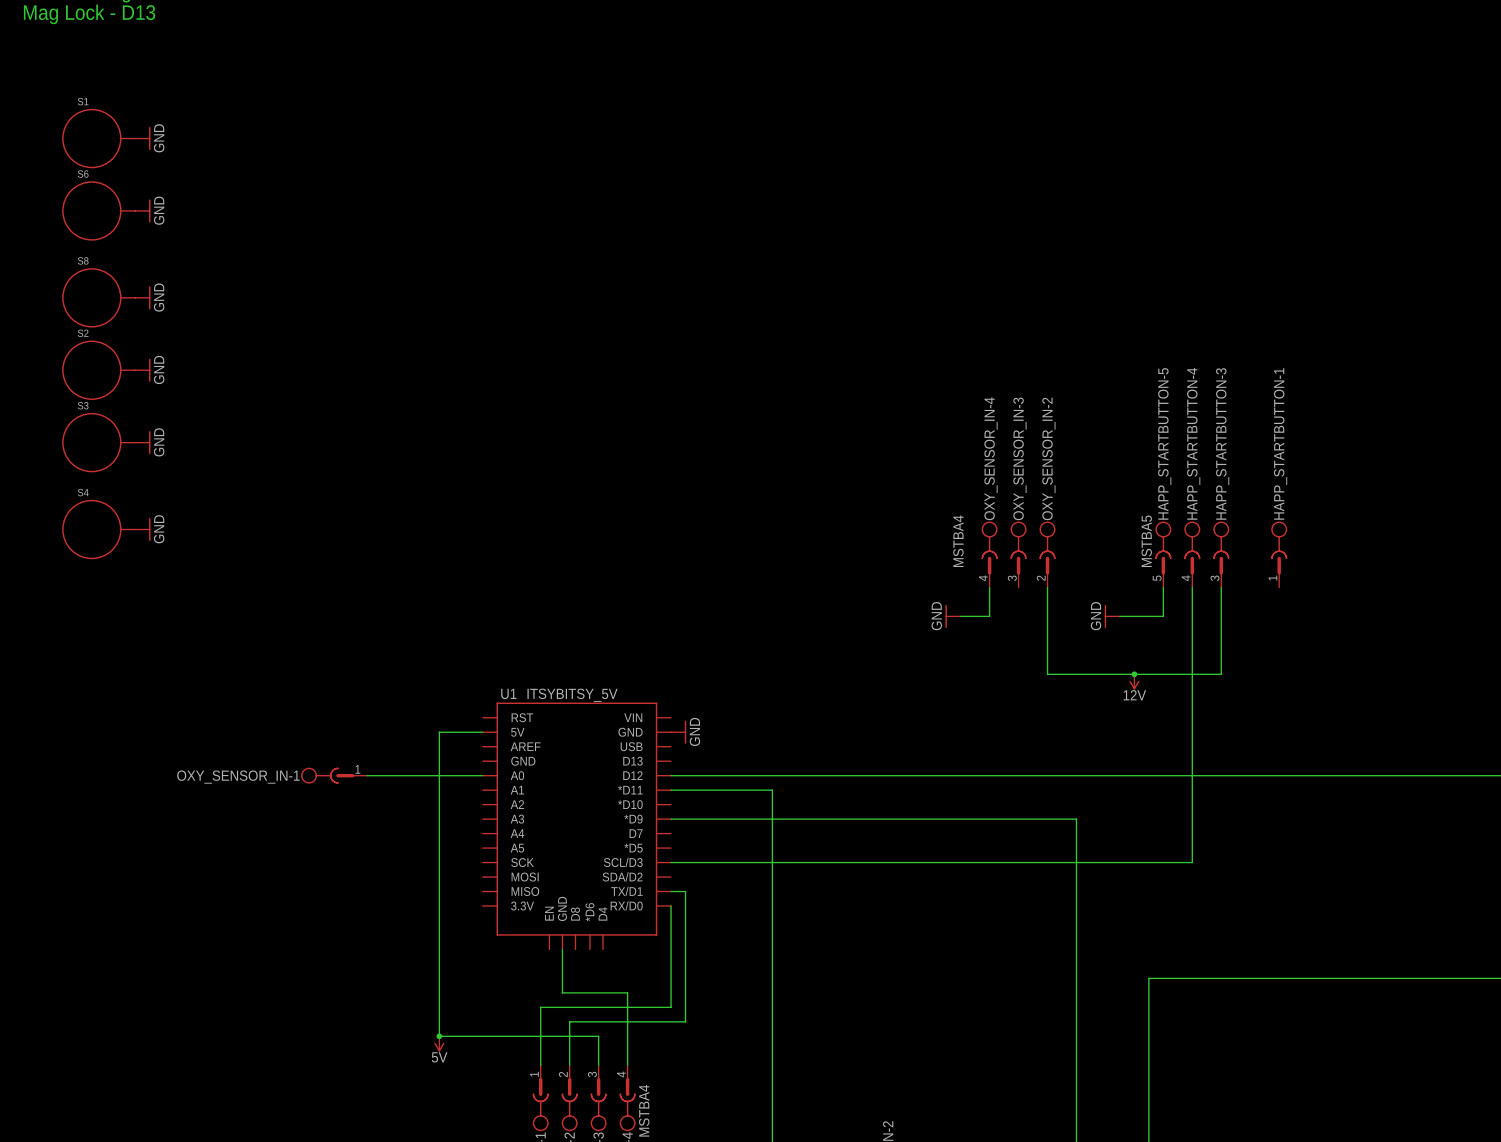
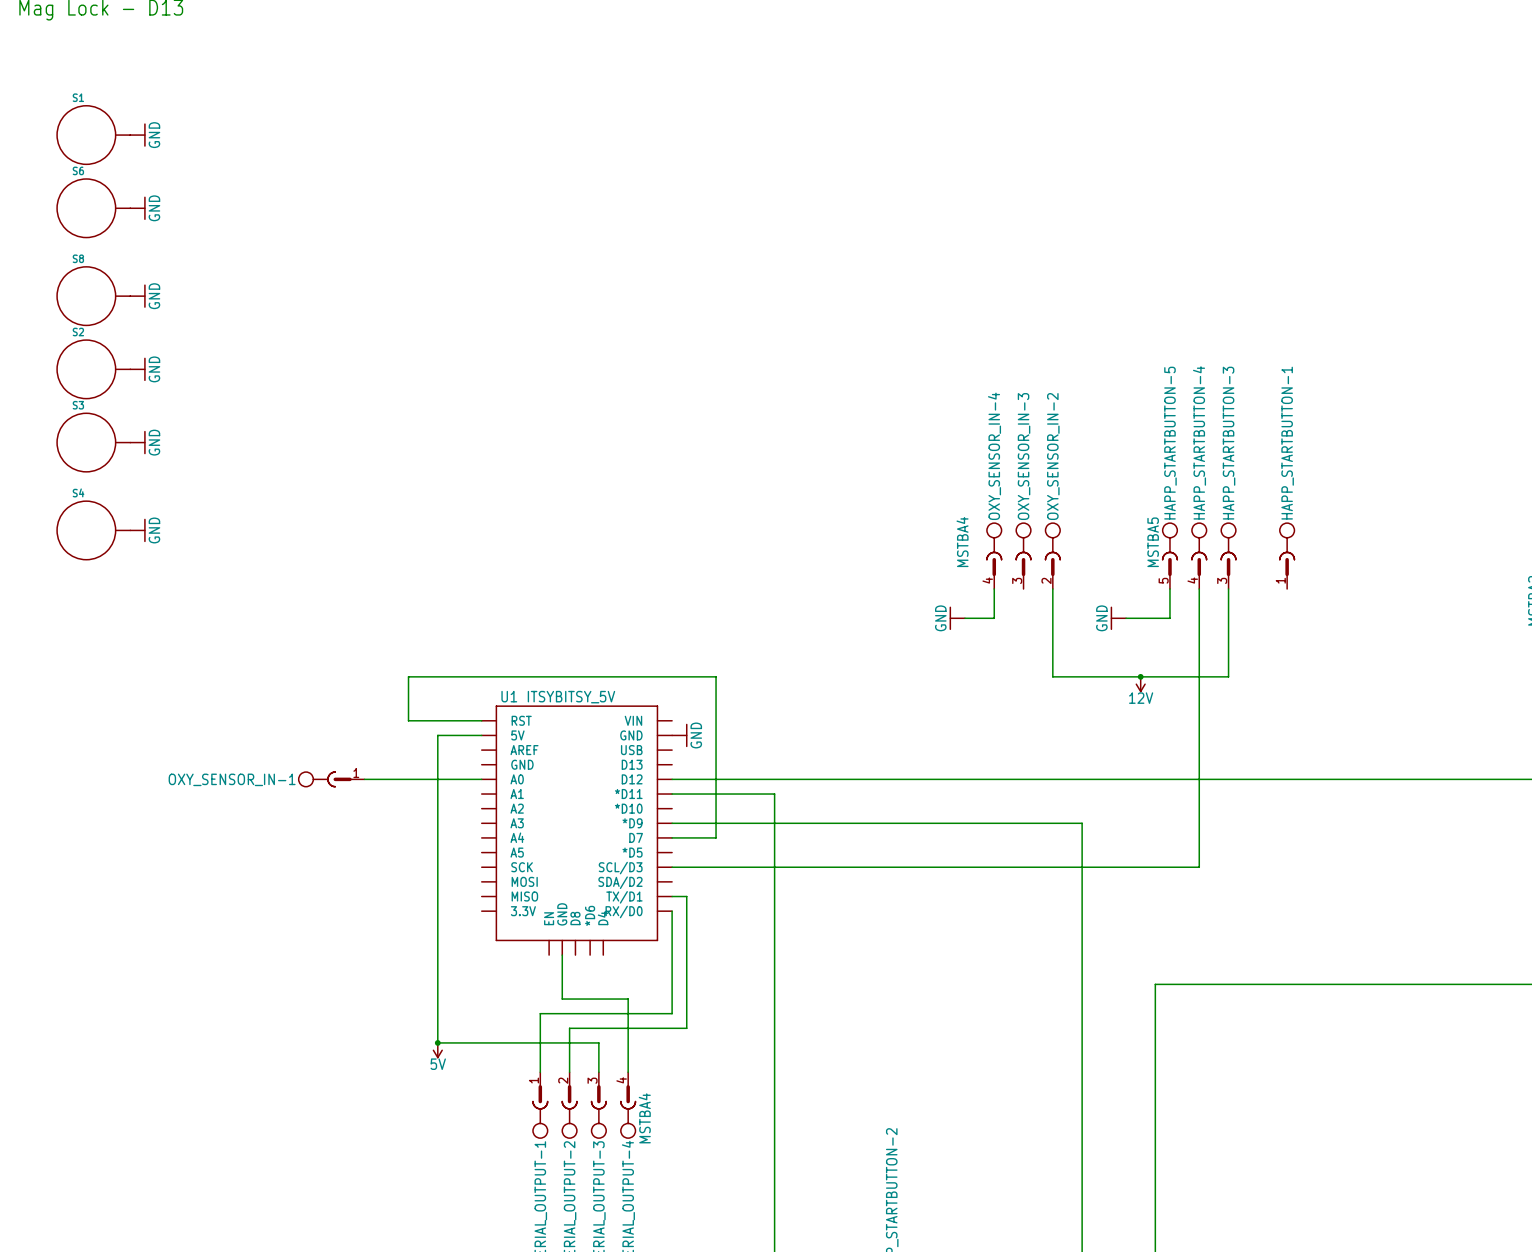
wire: none -> (481, 720) (408, 720) (408, 676) (716, 676) (716, 837) (672, 837)

